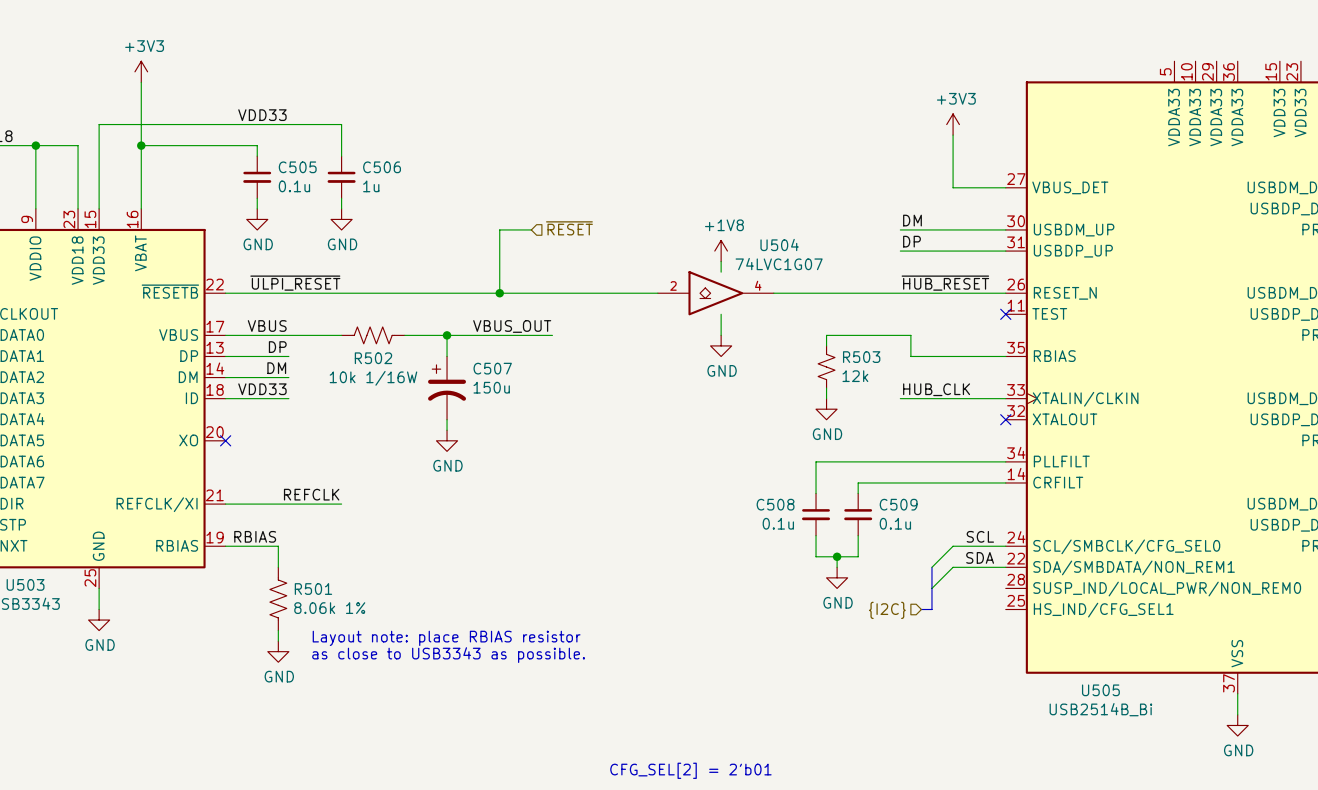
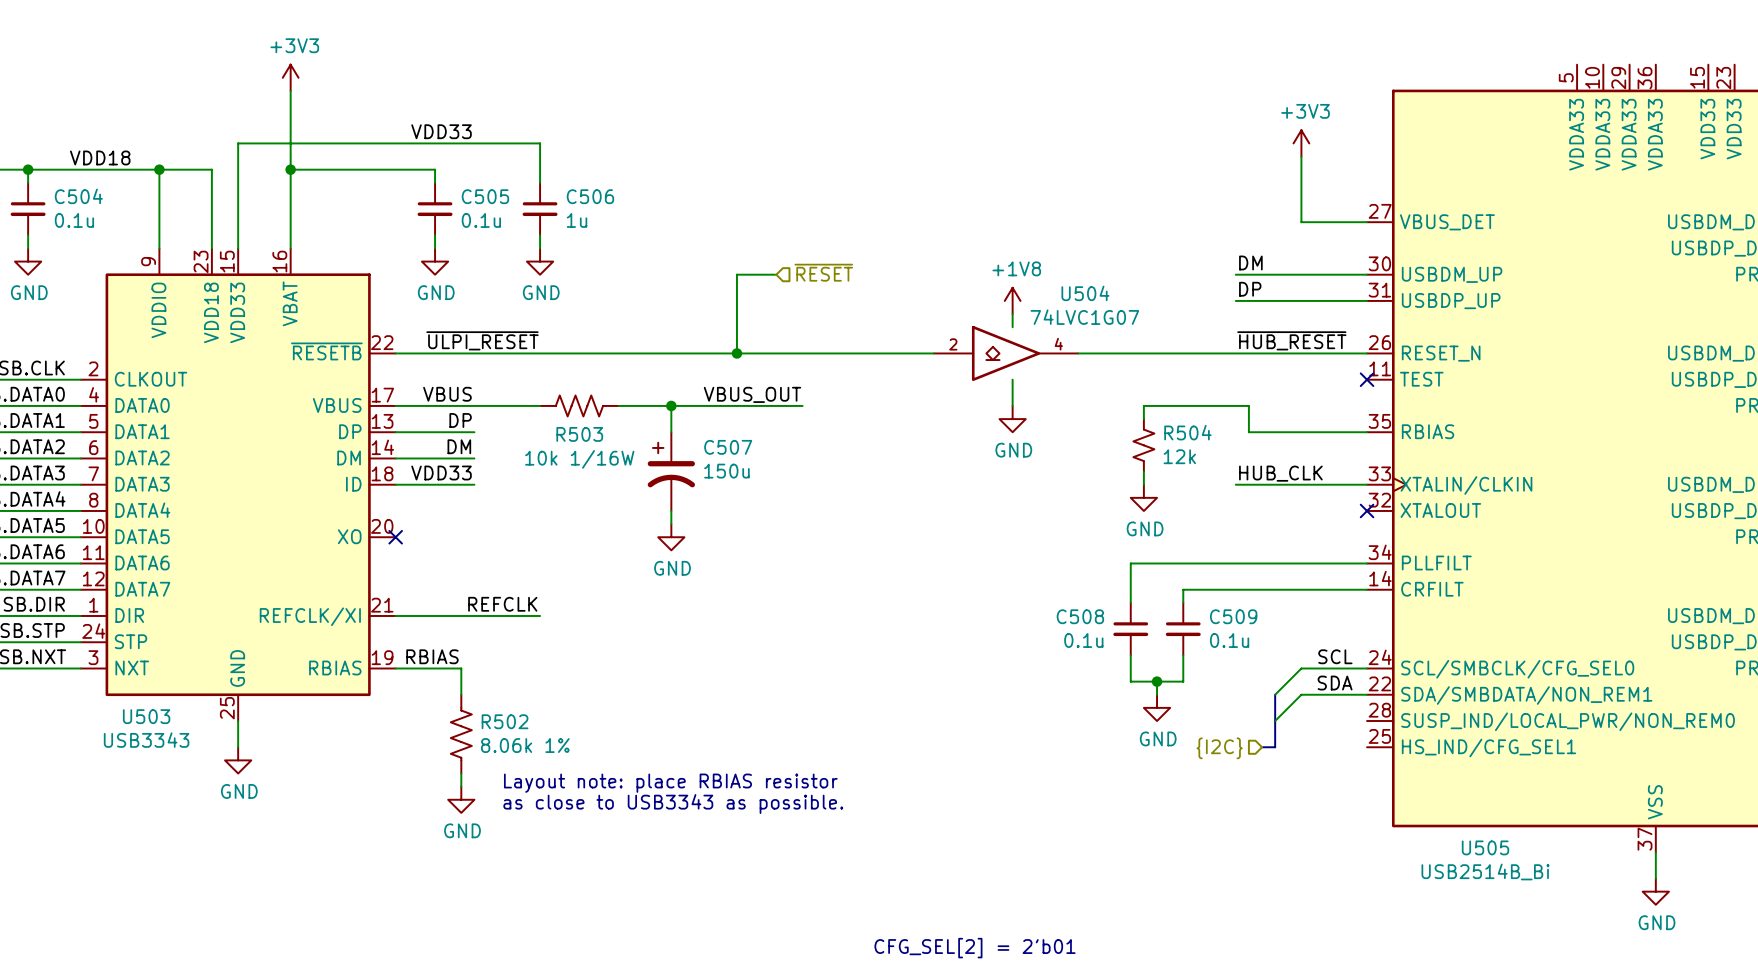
R503 name: R503 (861, 357) -> R504 (1187, 432)
R502 name: R502 (373, 358) -> R503 (579, 434)
R501 name: R501 (313, 589) -> R502 (505, 721)

